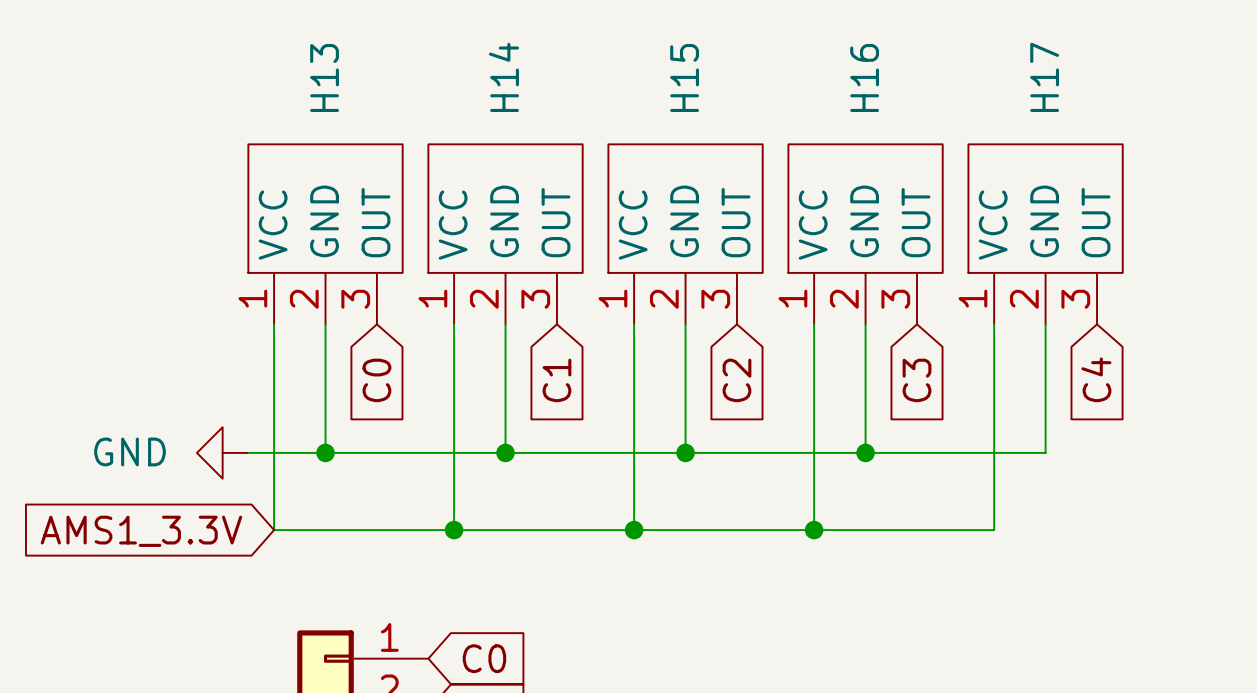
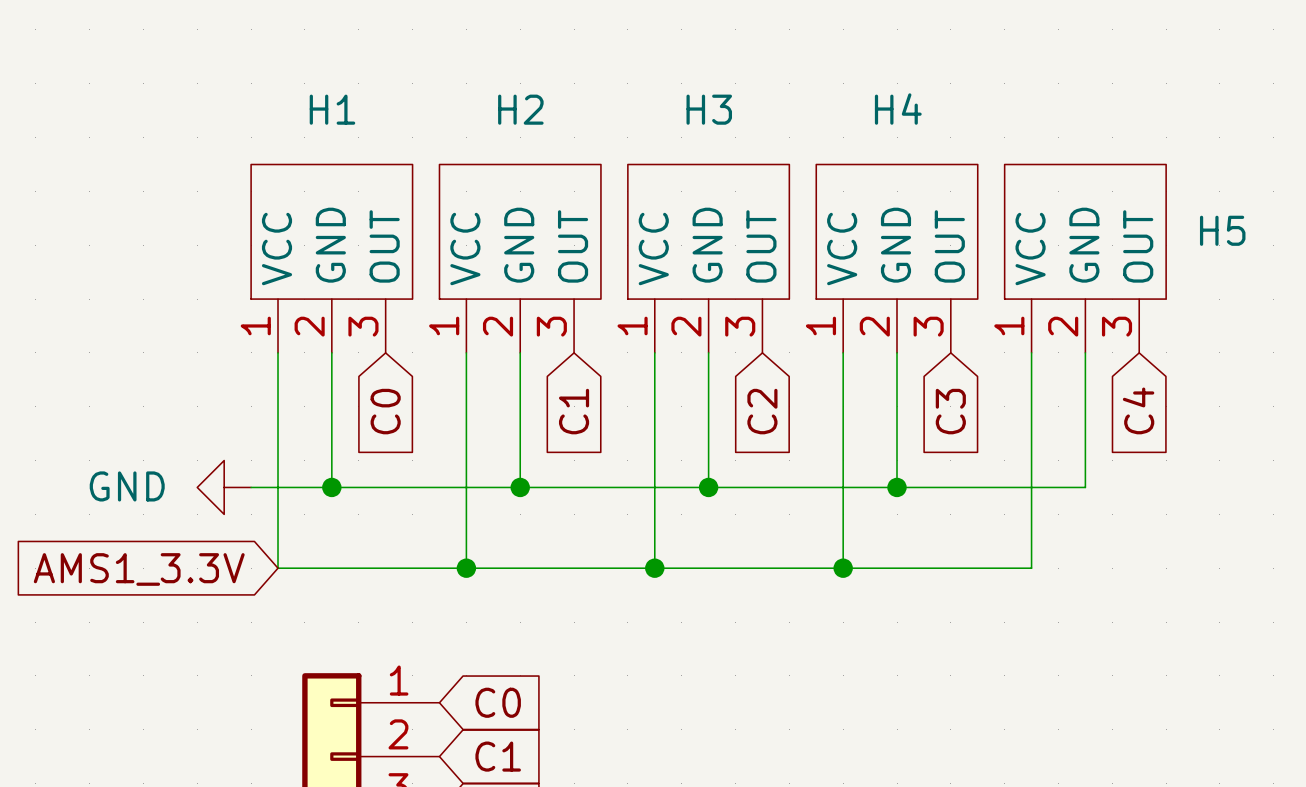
H14 name: H14 (503, 77) -> H2 (520, 109)
H17 name: H17 (1044, 77) -> H5 (1222, 230)
H13 name: H13 (324, 78) -> H1 (332, 109)
H15 name: H15 (684, 78) -> H3 (709, 109)
H16 name: H16 (864, 78) -> H4 (898, 109)

